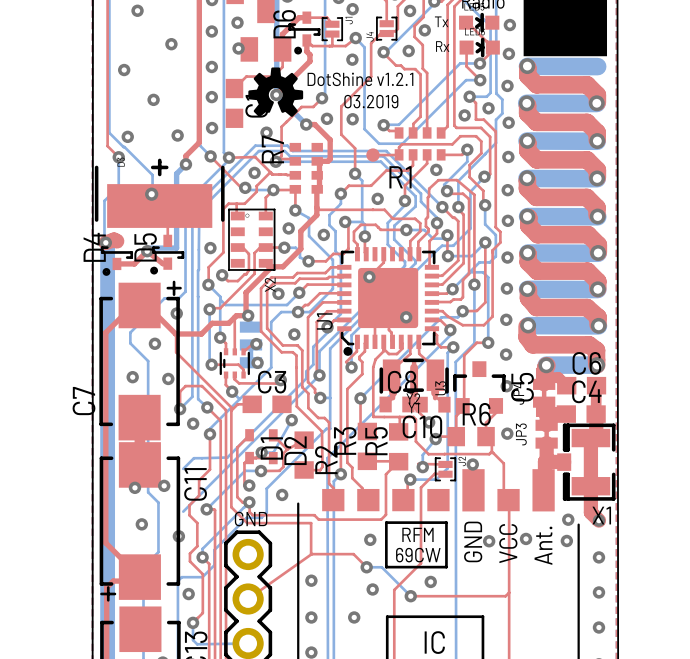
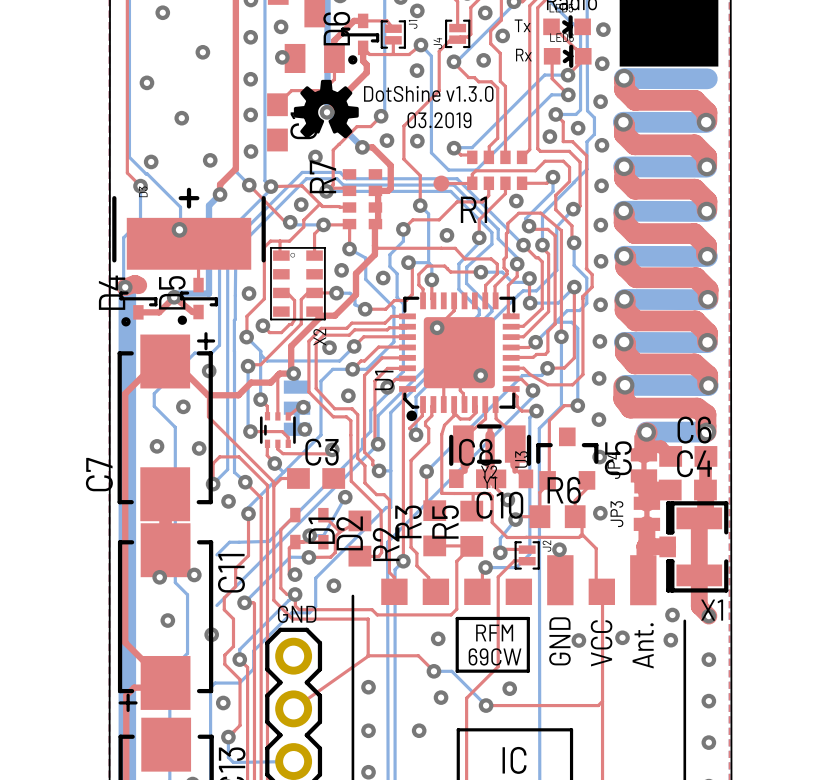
text: DotShine v1.2.1 (360, 79) -> DotShine v1.3.0 (428, 93)

